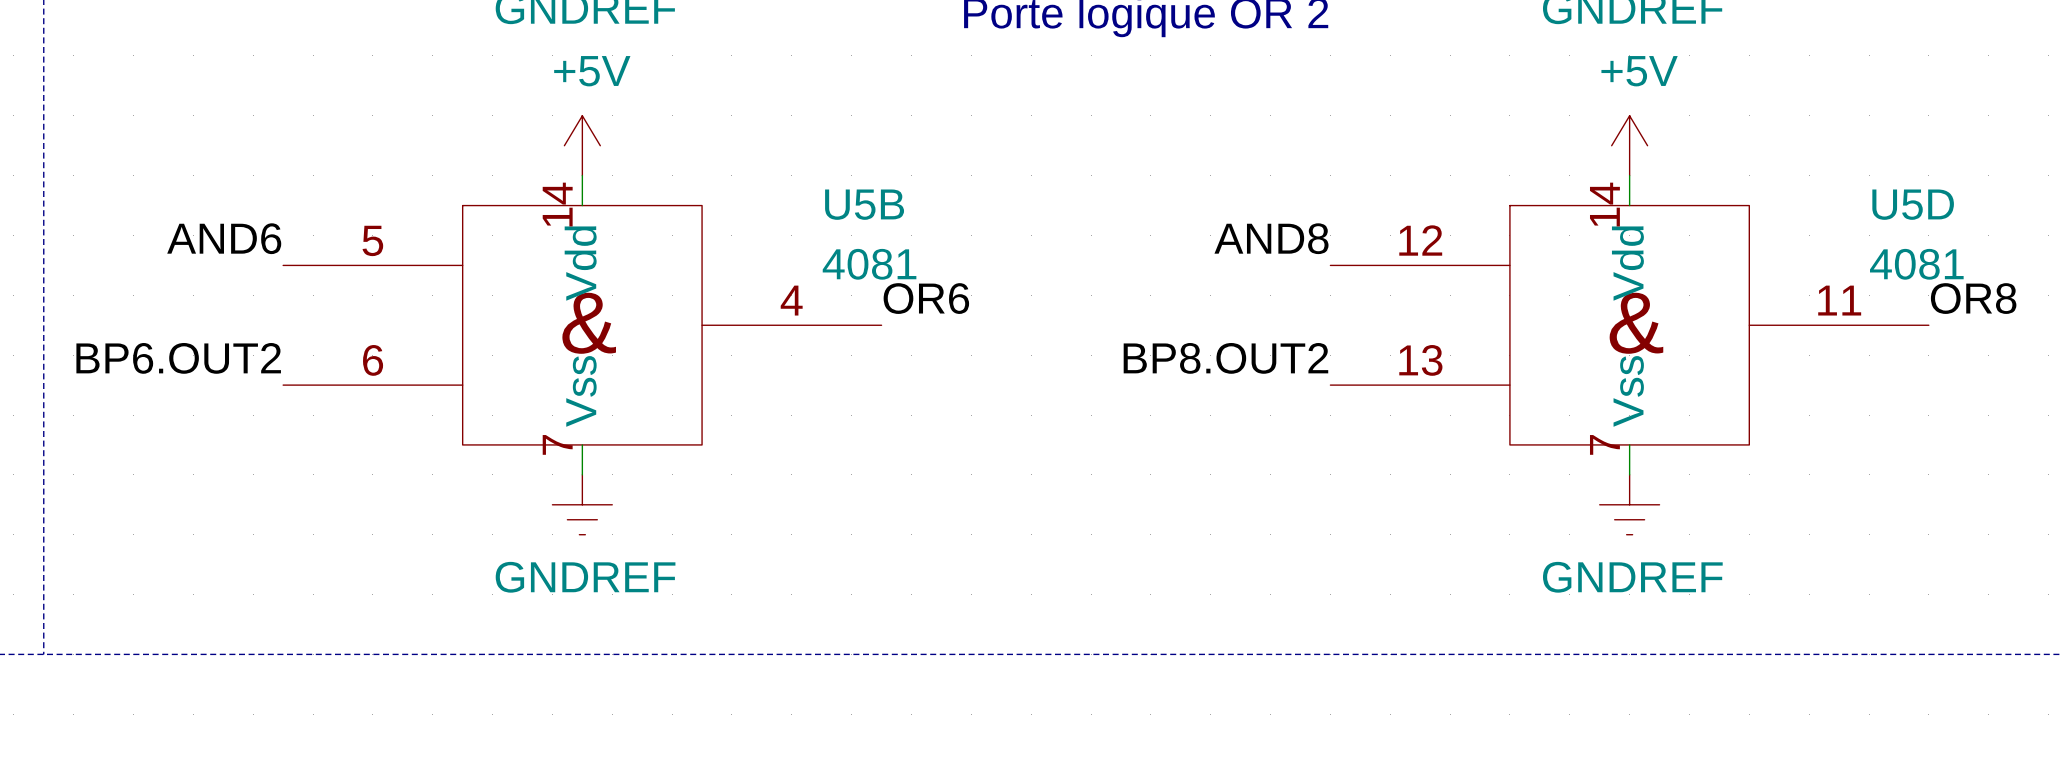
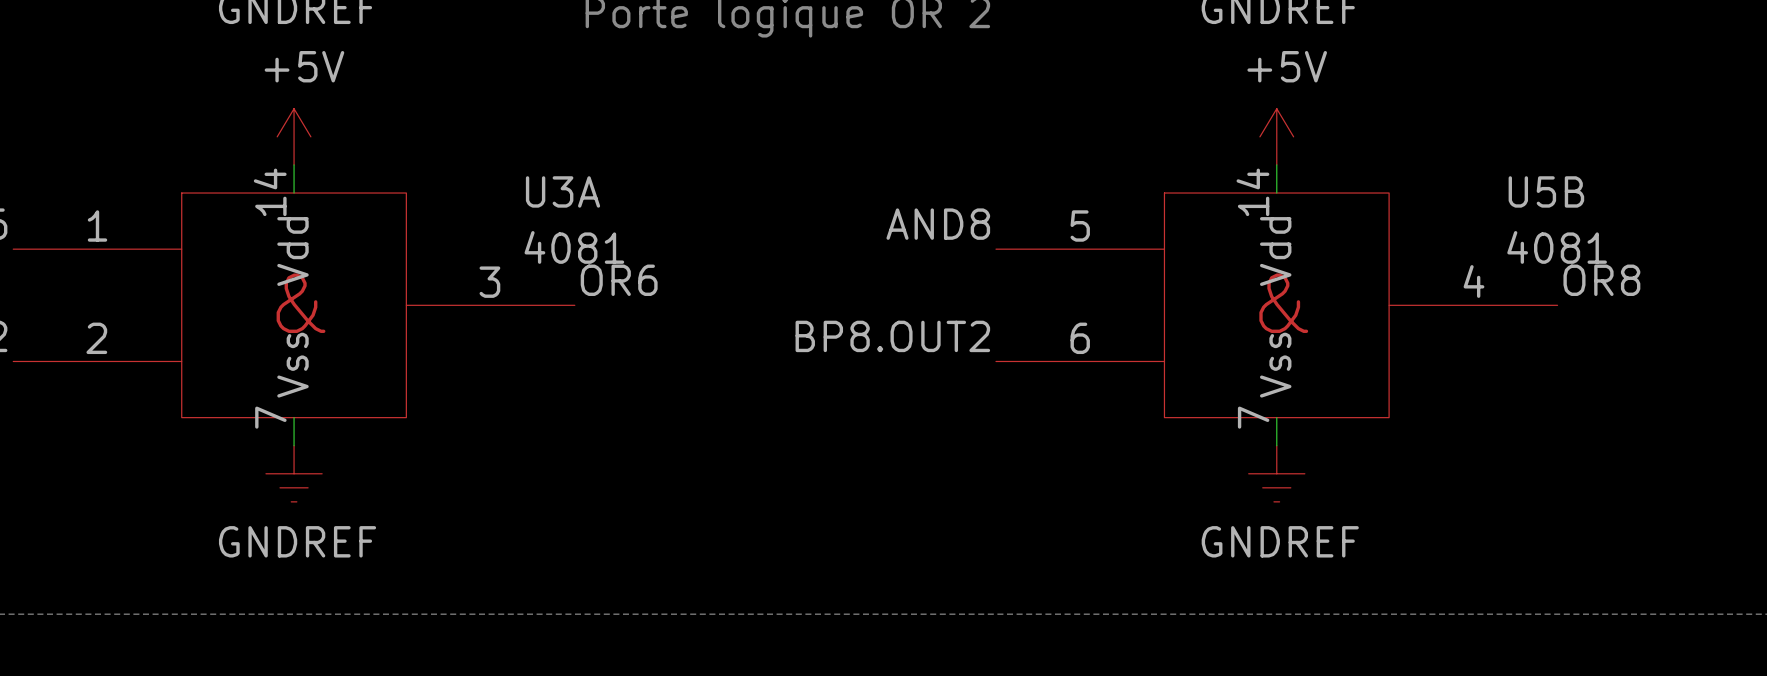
U5B position: (582, 325) -> (1276, 305)
U3A: none -> 4081 (294, 305)
U5D: 4081 (1629, 325) -> none

